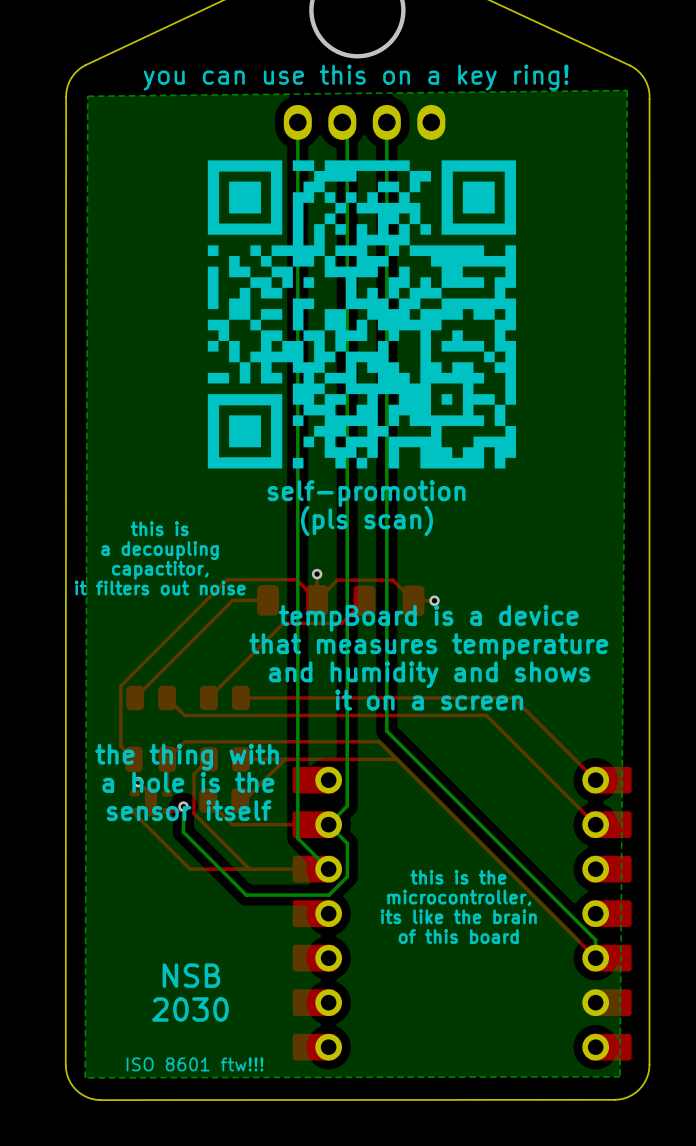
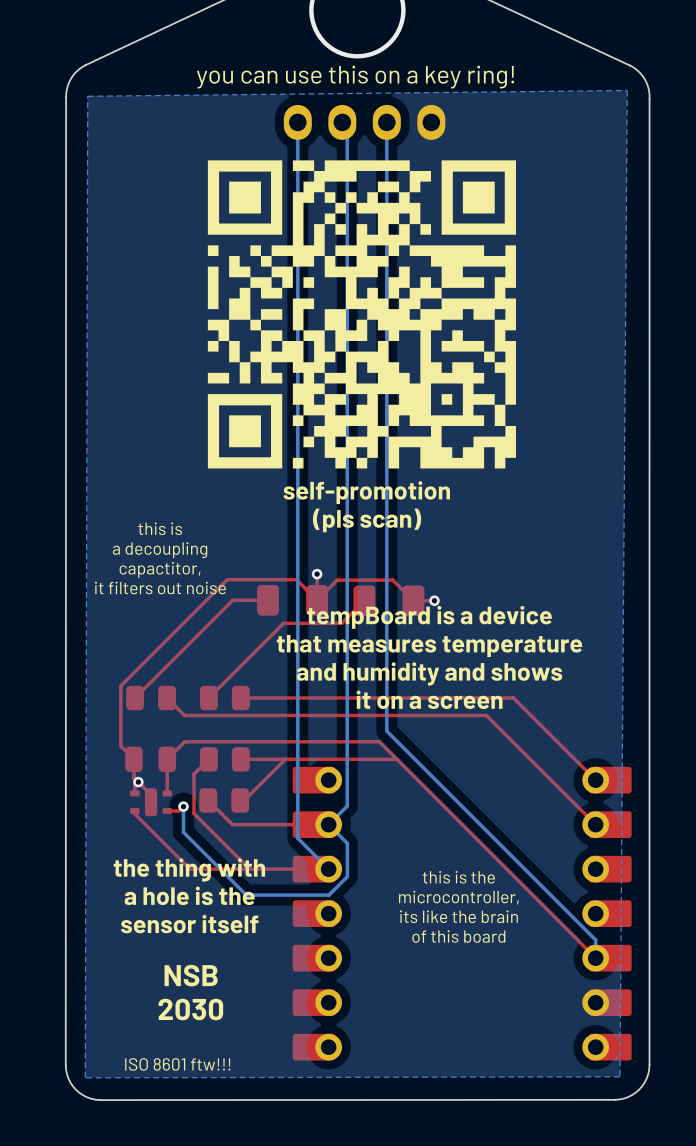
text position: the thing with (187, 757) -> the thing with (189, 869)
text position: a hole is the (188, 782) -> a hole is the (189, 895)
text position: sensor itself (189, 810) -> sensor itself (189, 924)

